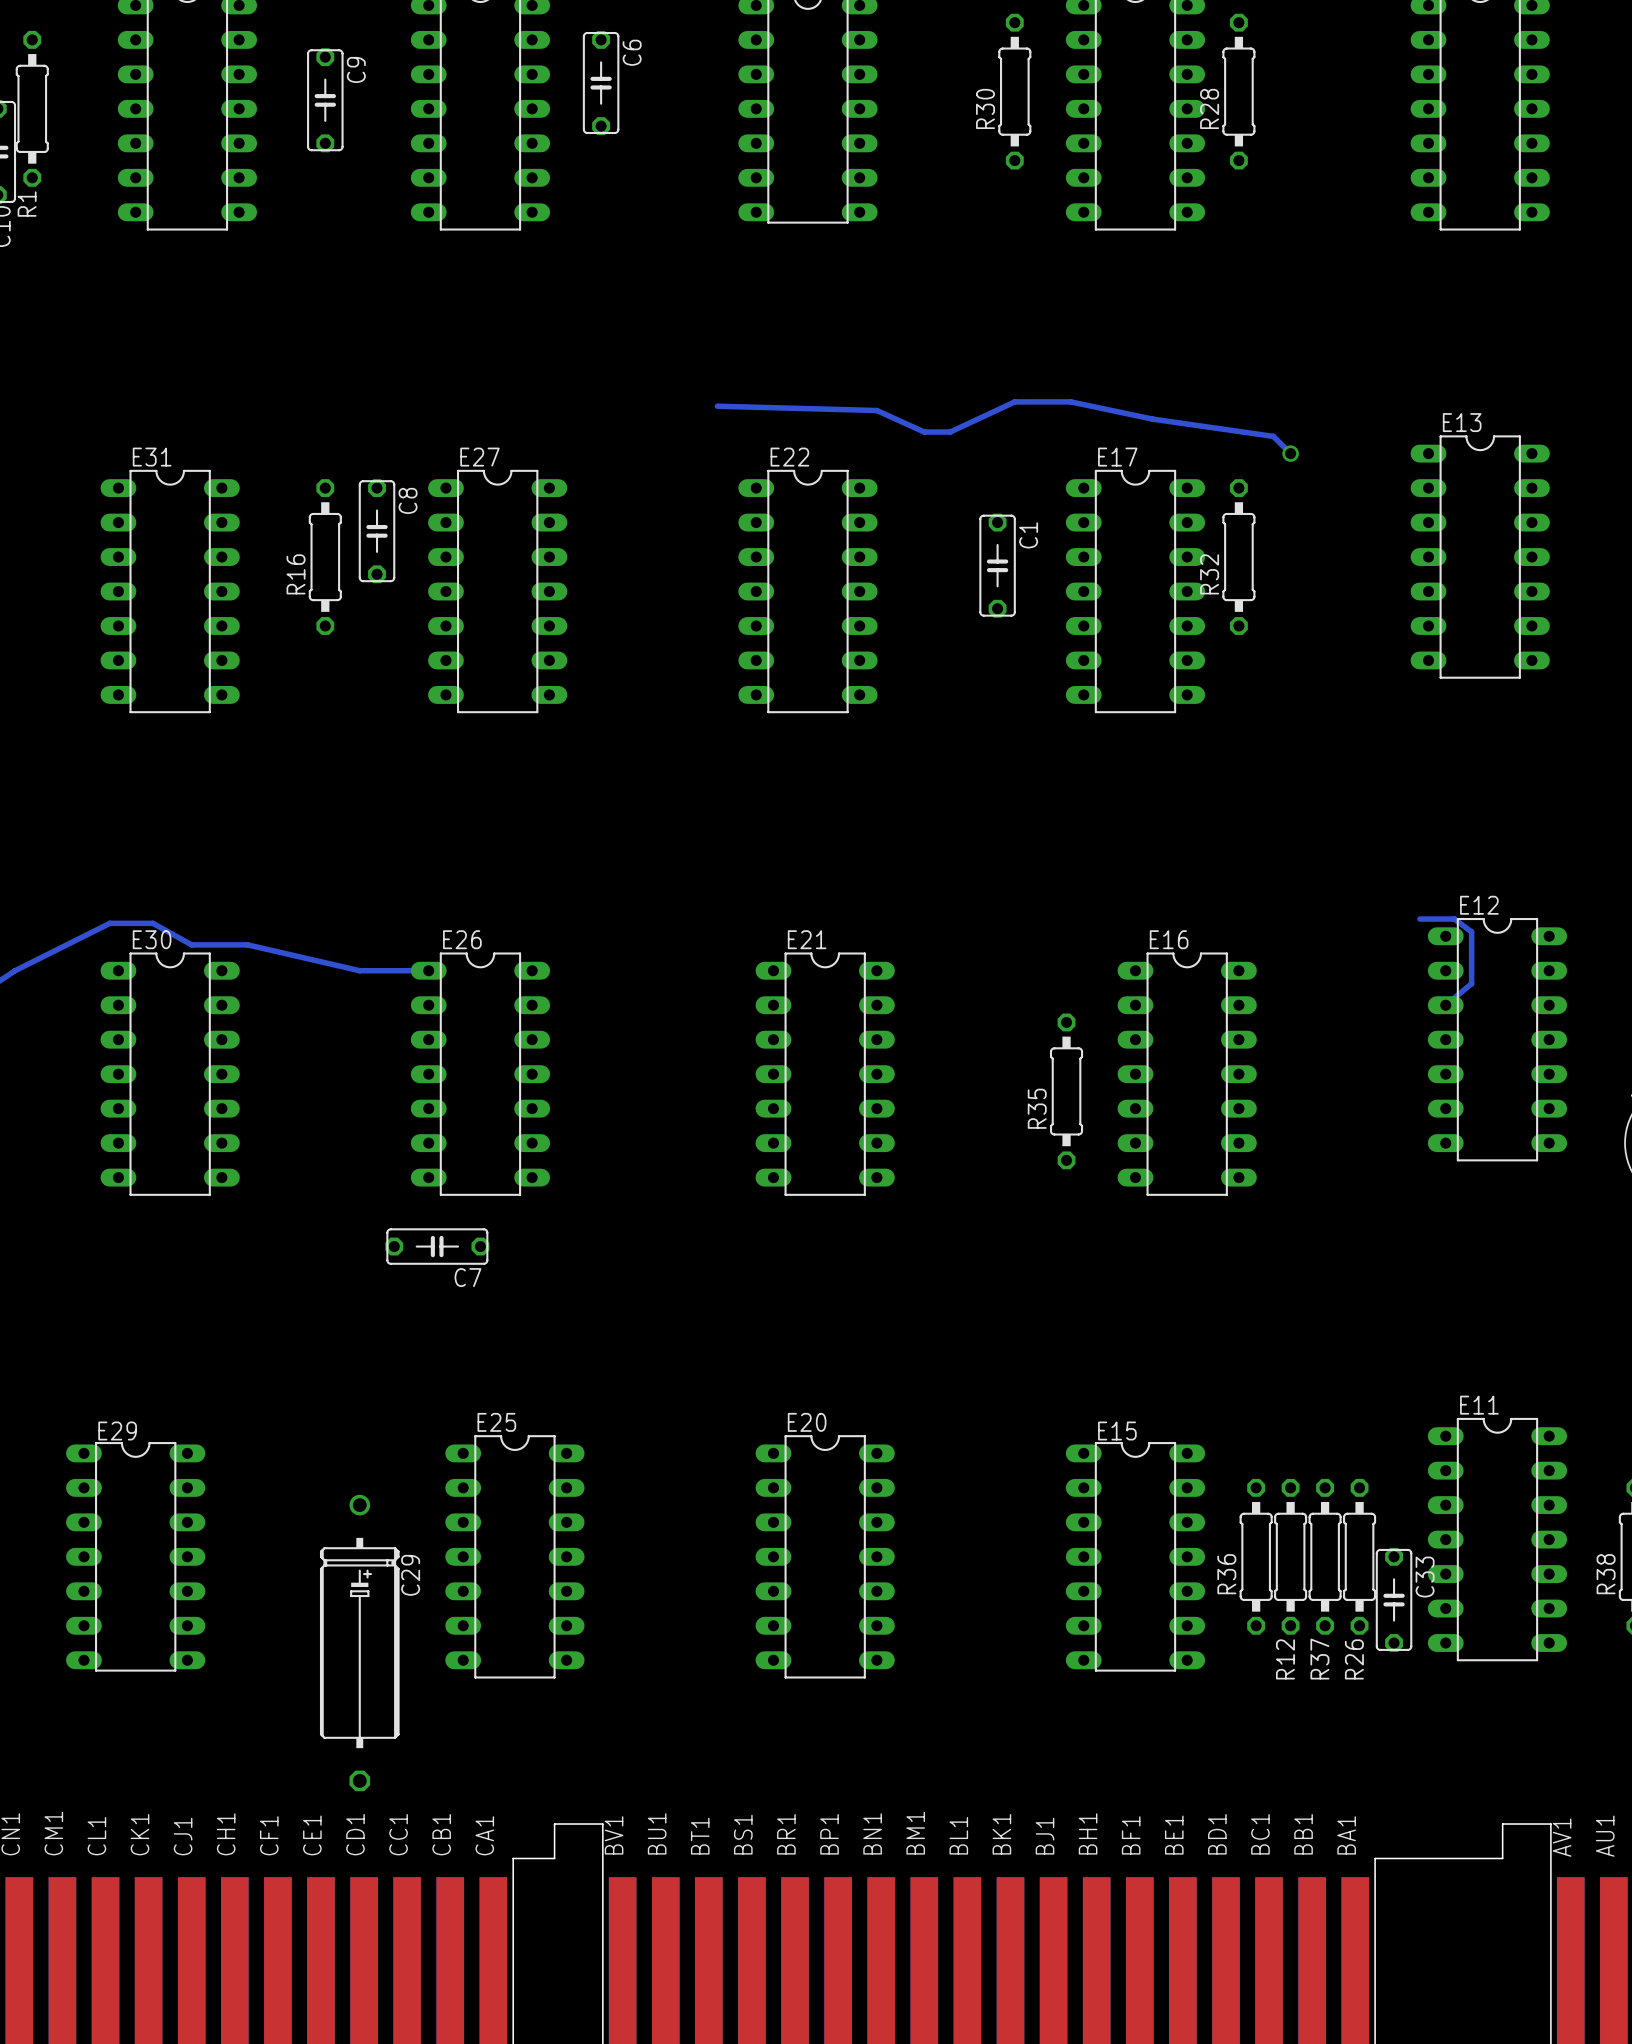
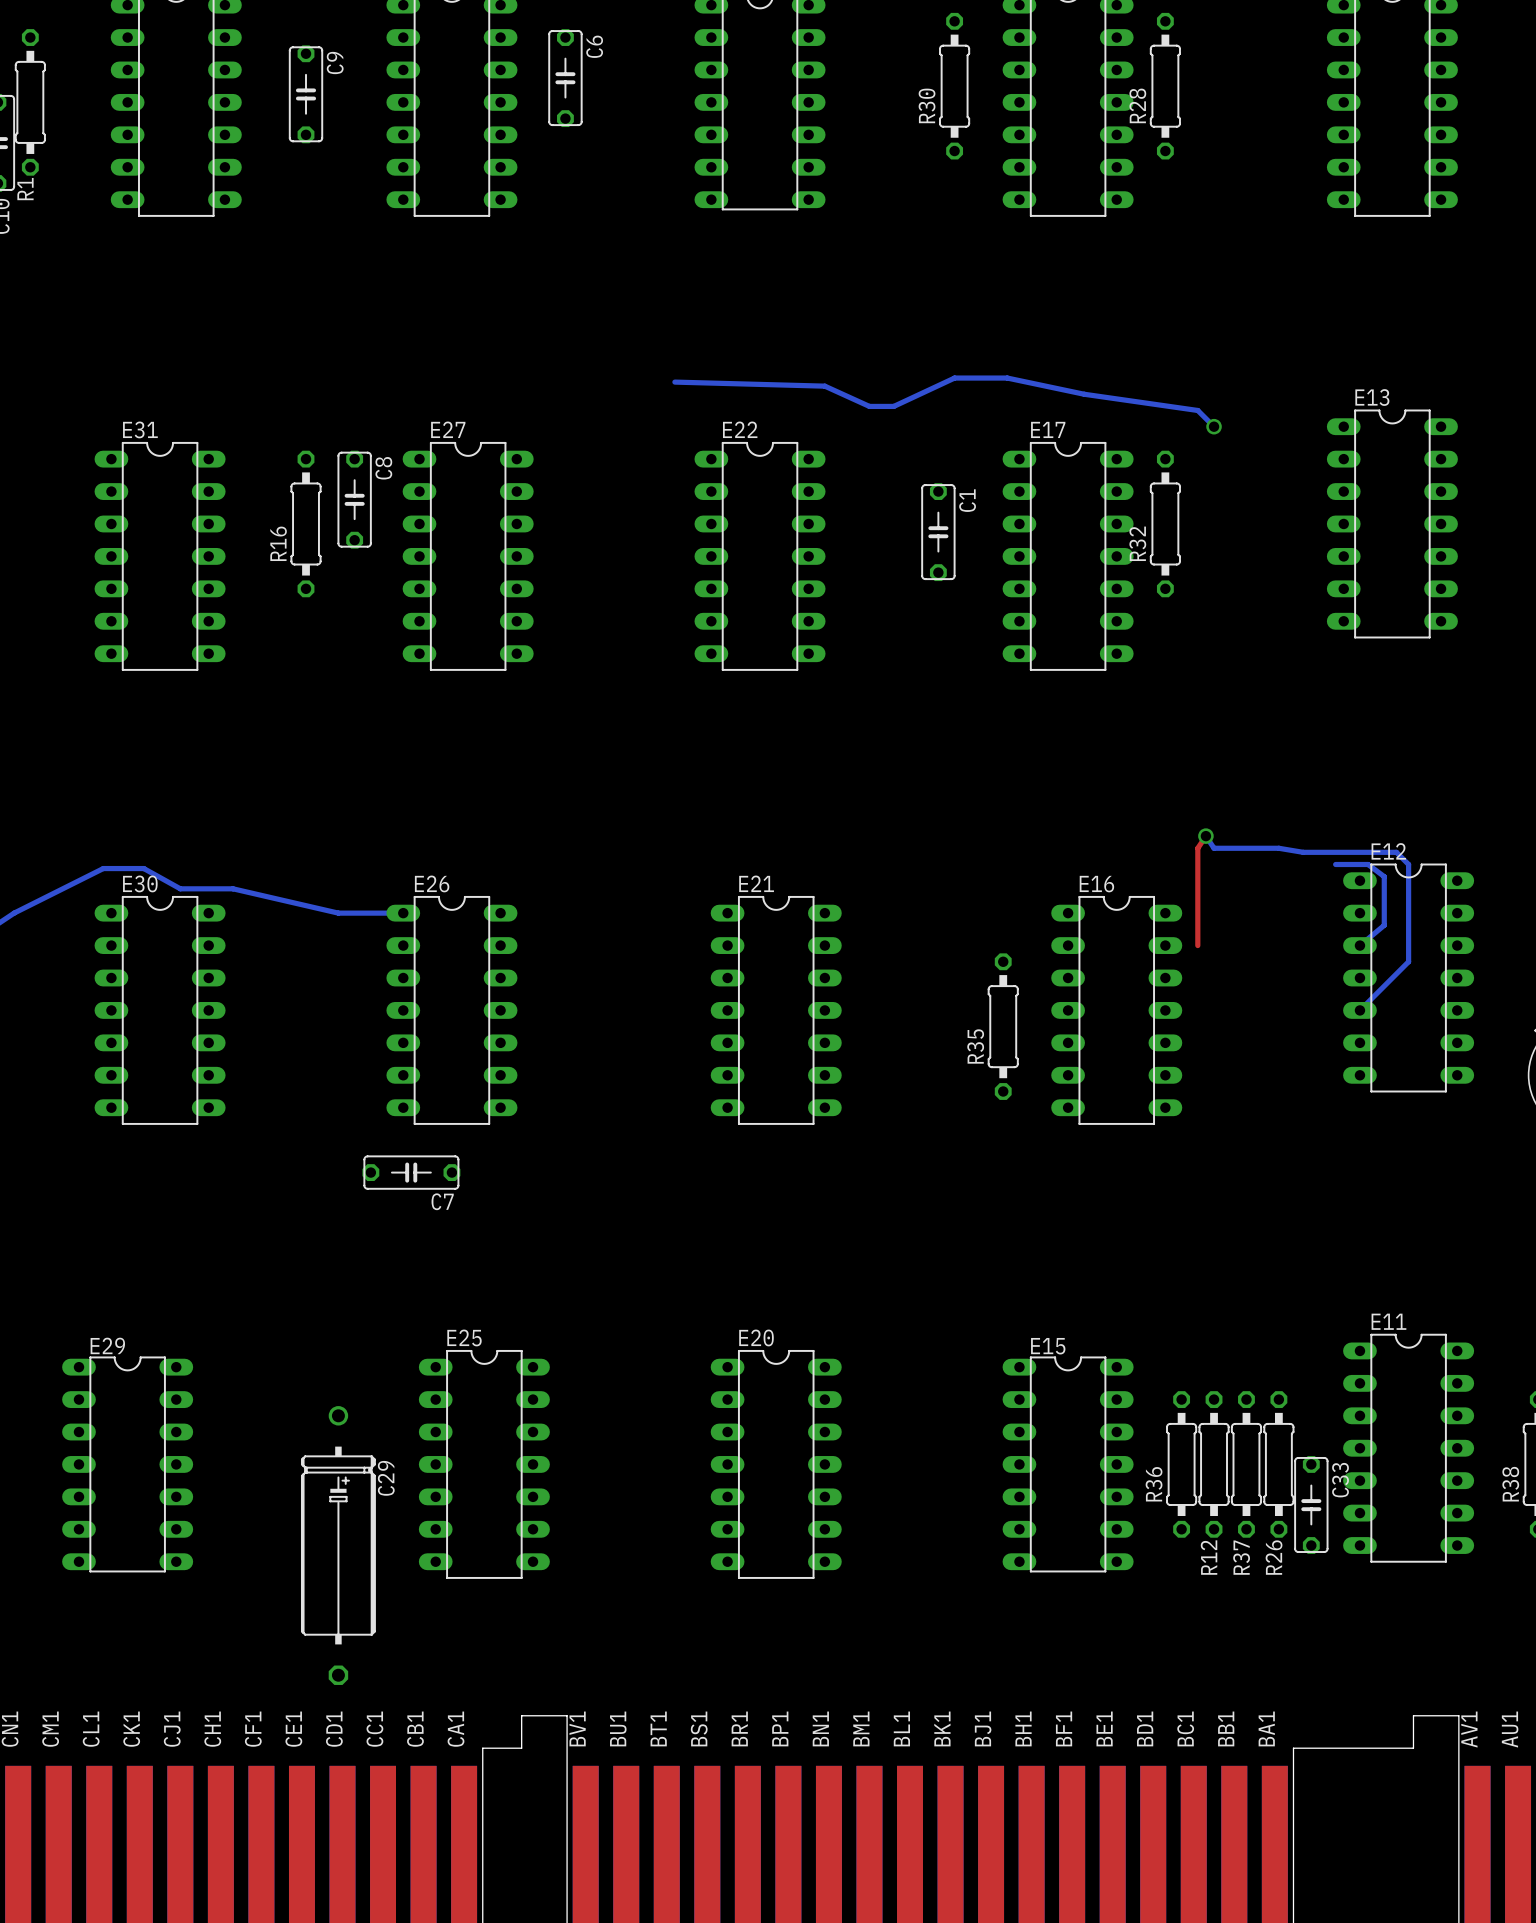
bottom track: none -> (1205, 836) (1214, 848) (1278, 848) (1303, 852) (1396, 852) (1408, 864) (1408, 961) (1359, 1010)
top track: none -> (1205, 836) (1197, 848) (1197, 945)
via: none -> (1205, 836)

